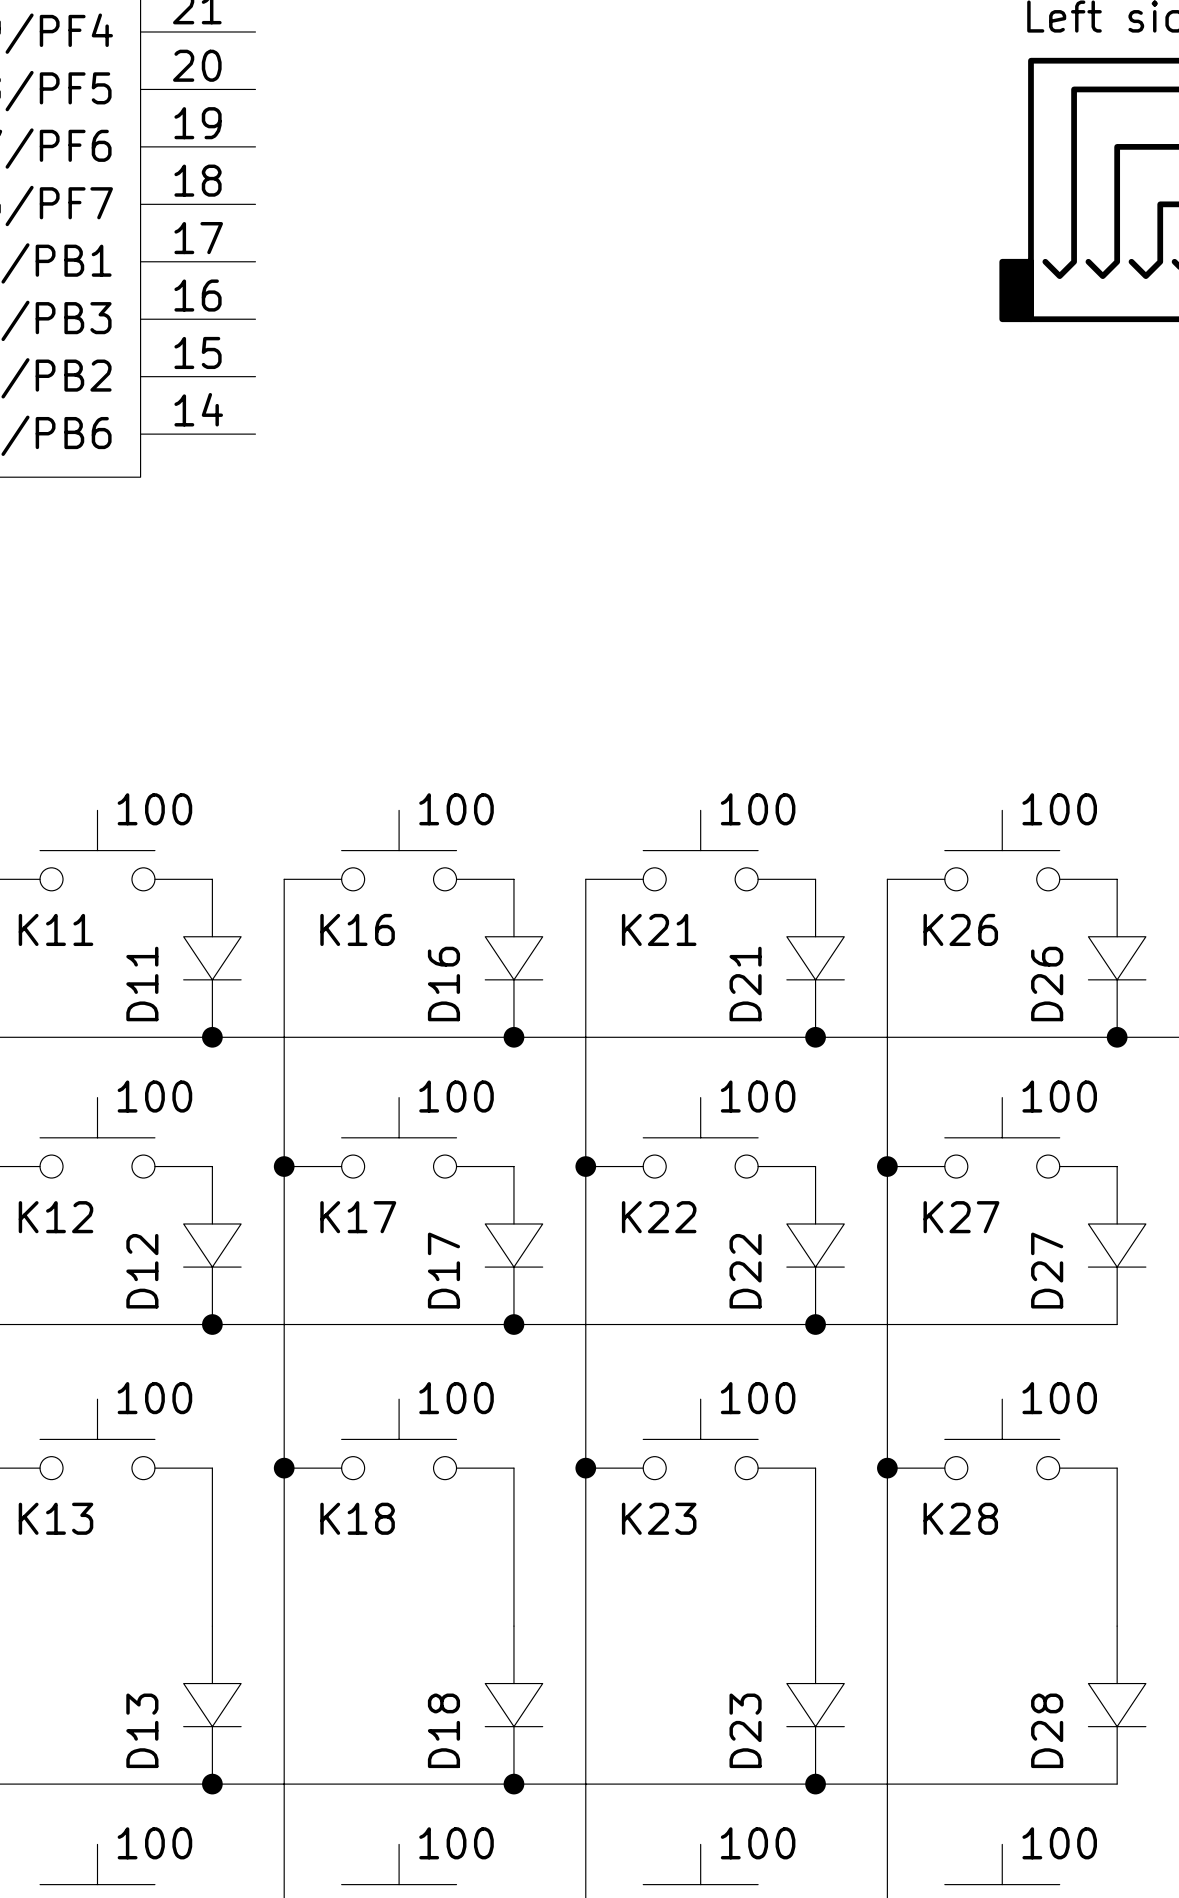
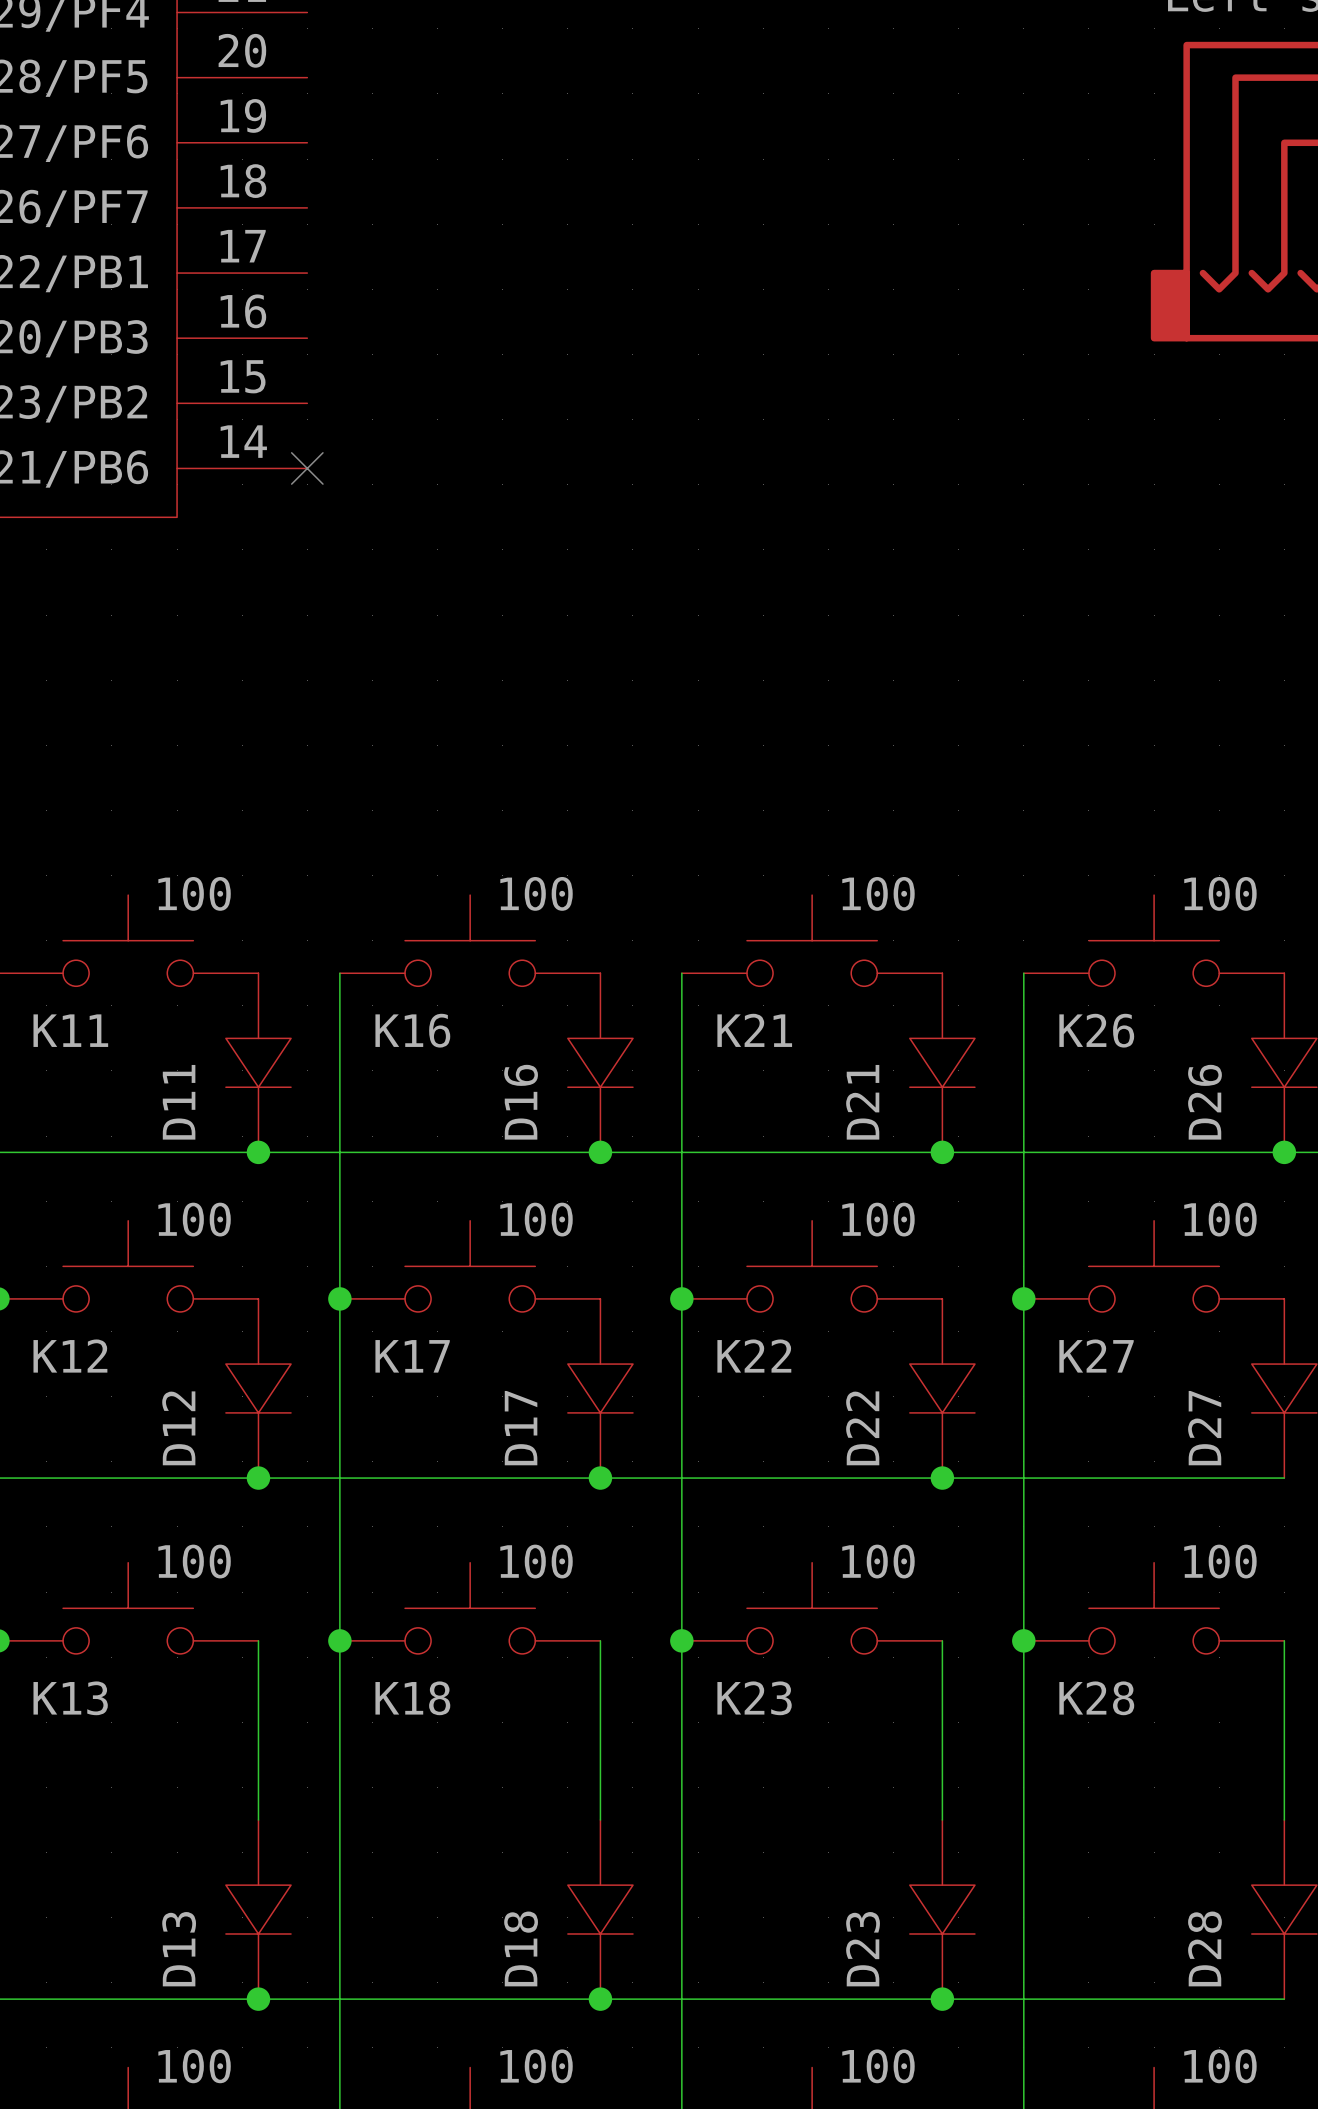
no-connect mark: none -> (307, 468)

